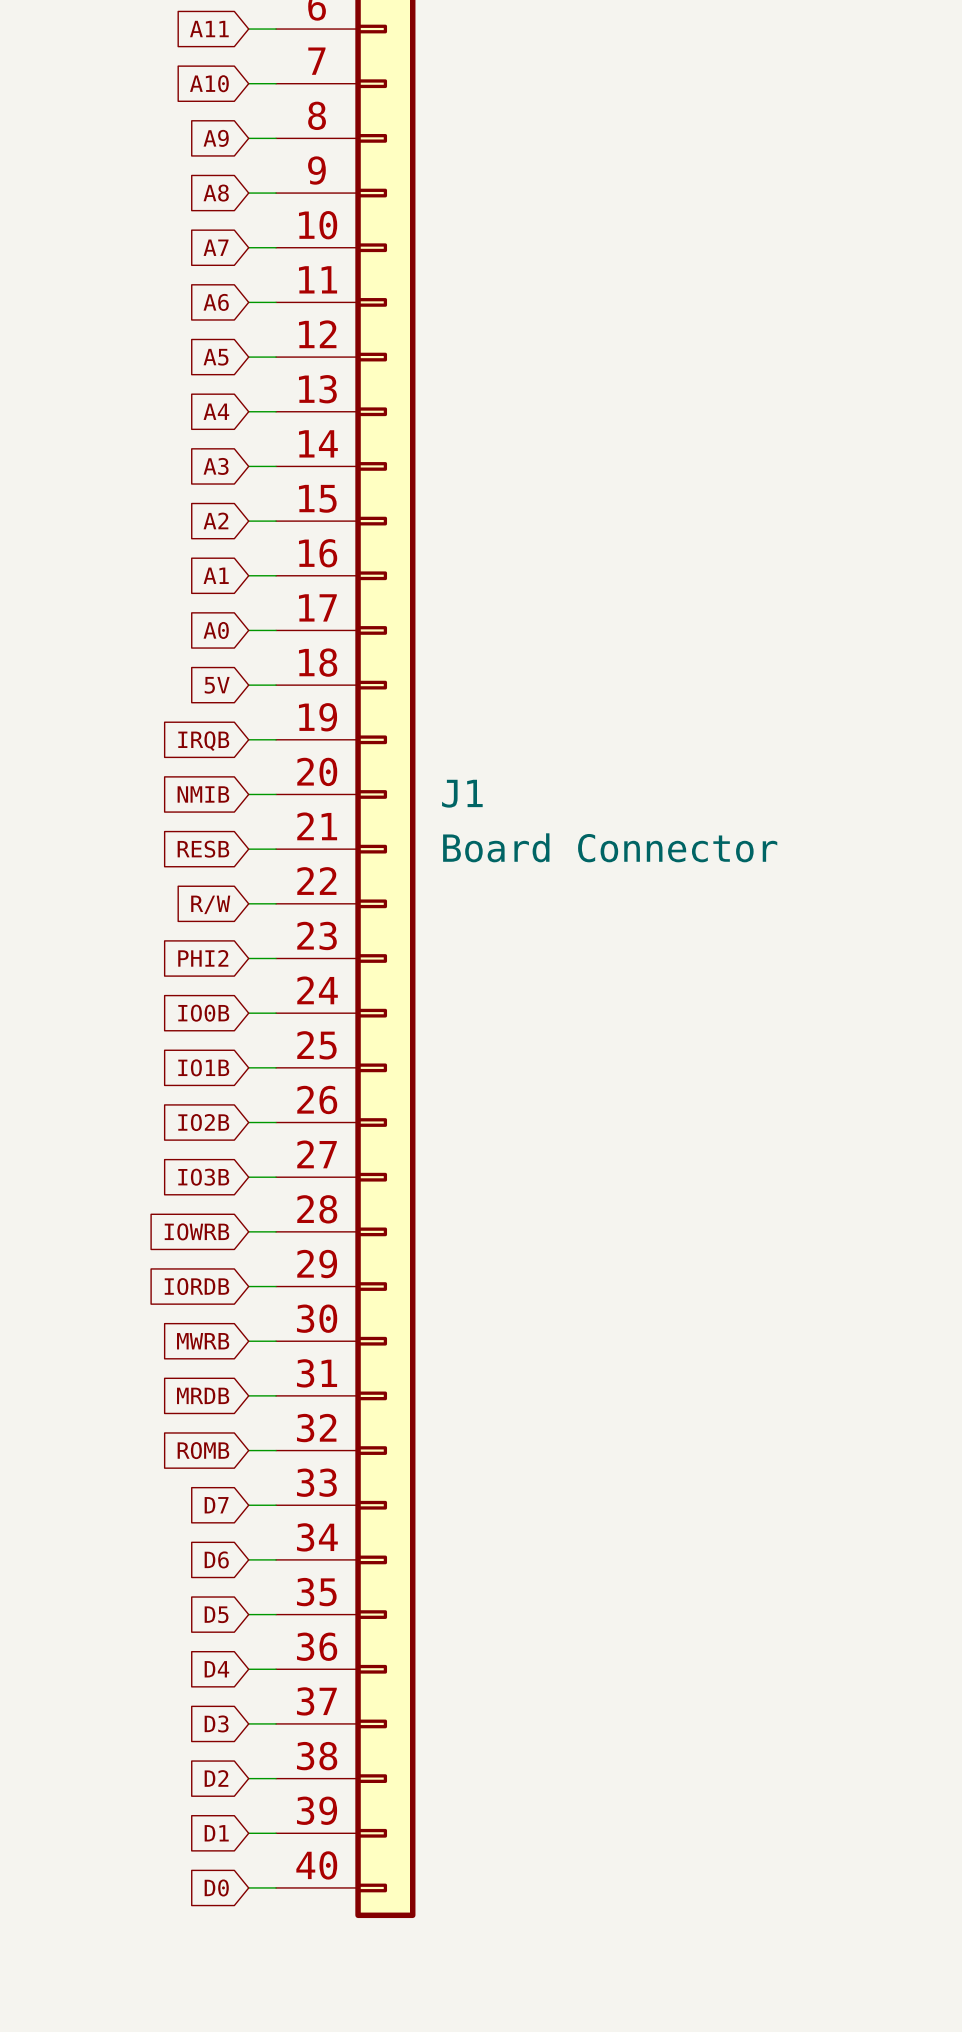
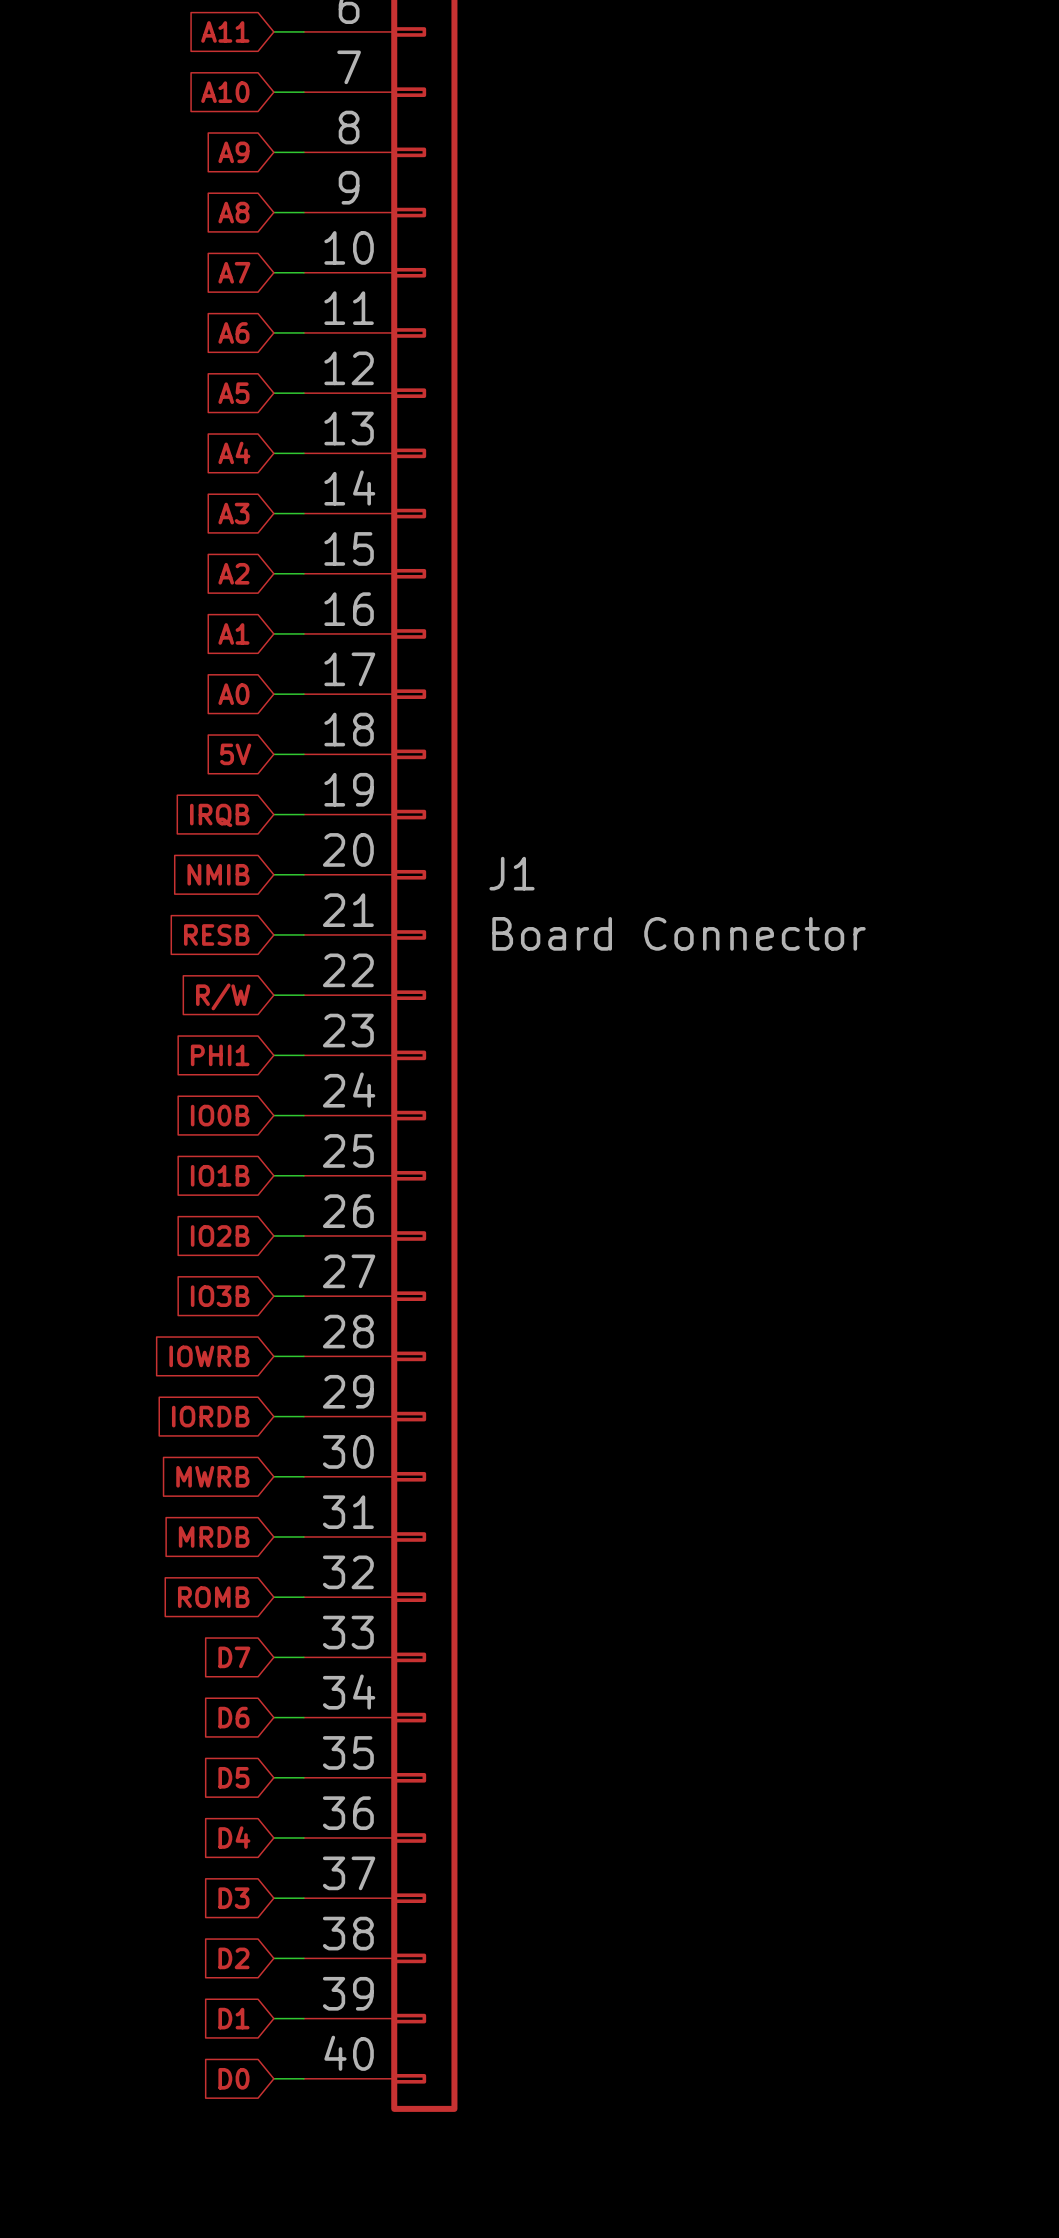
global label: PHI2 (203, 958) -> PHI1 (220, 1055)

